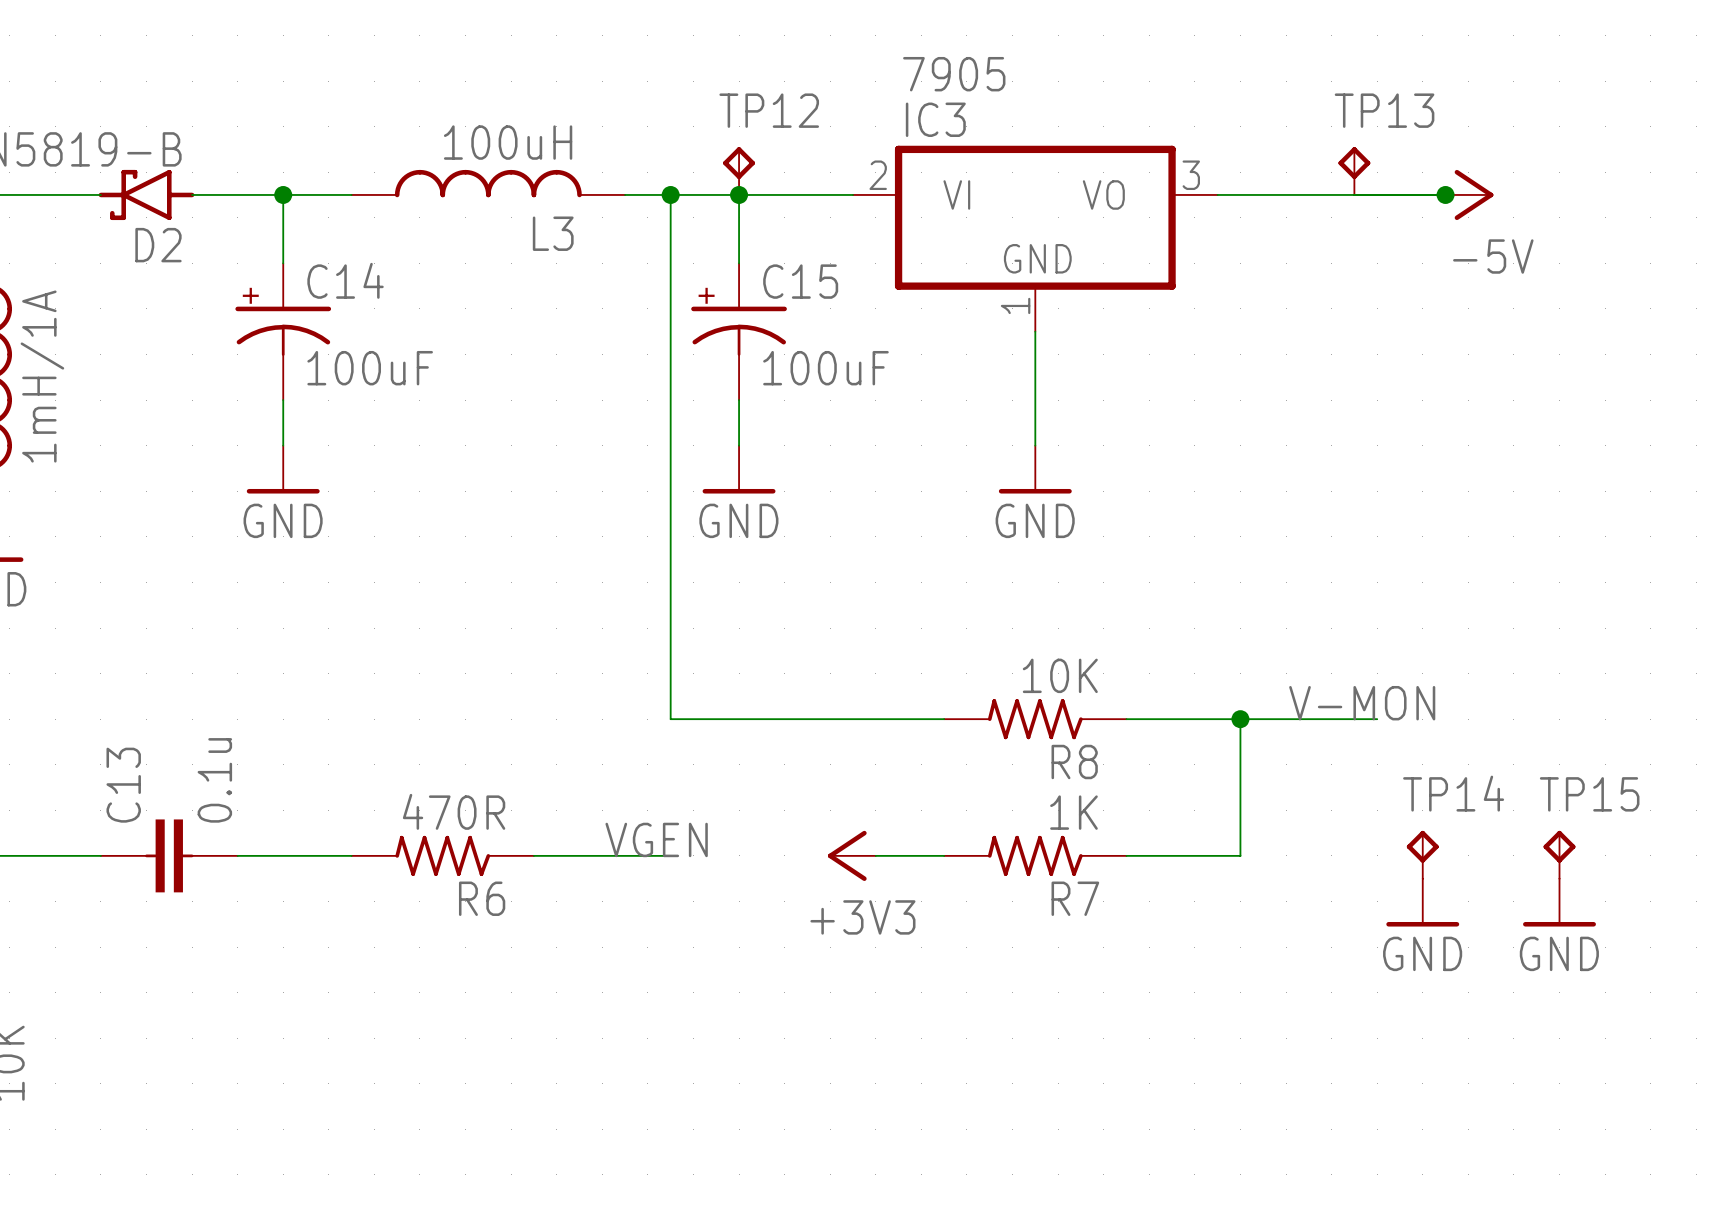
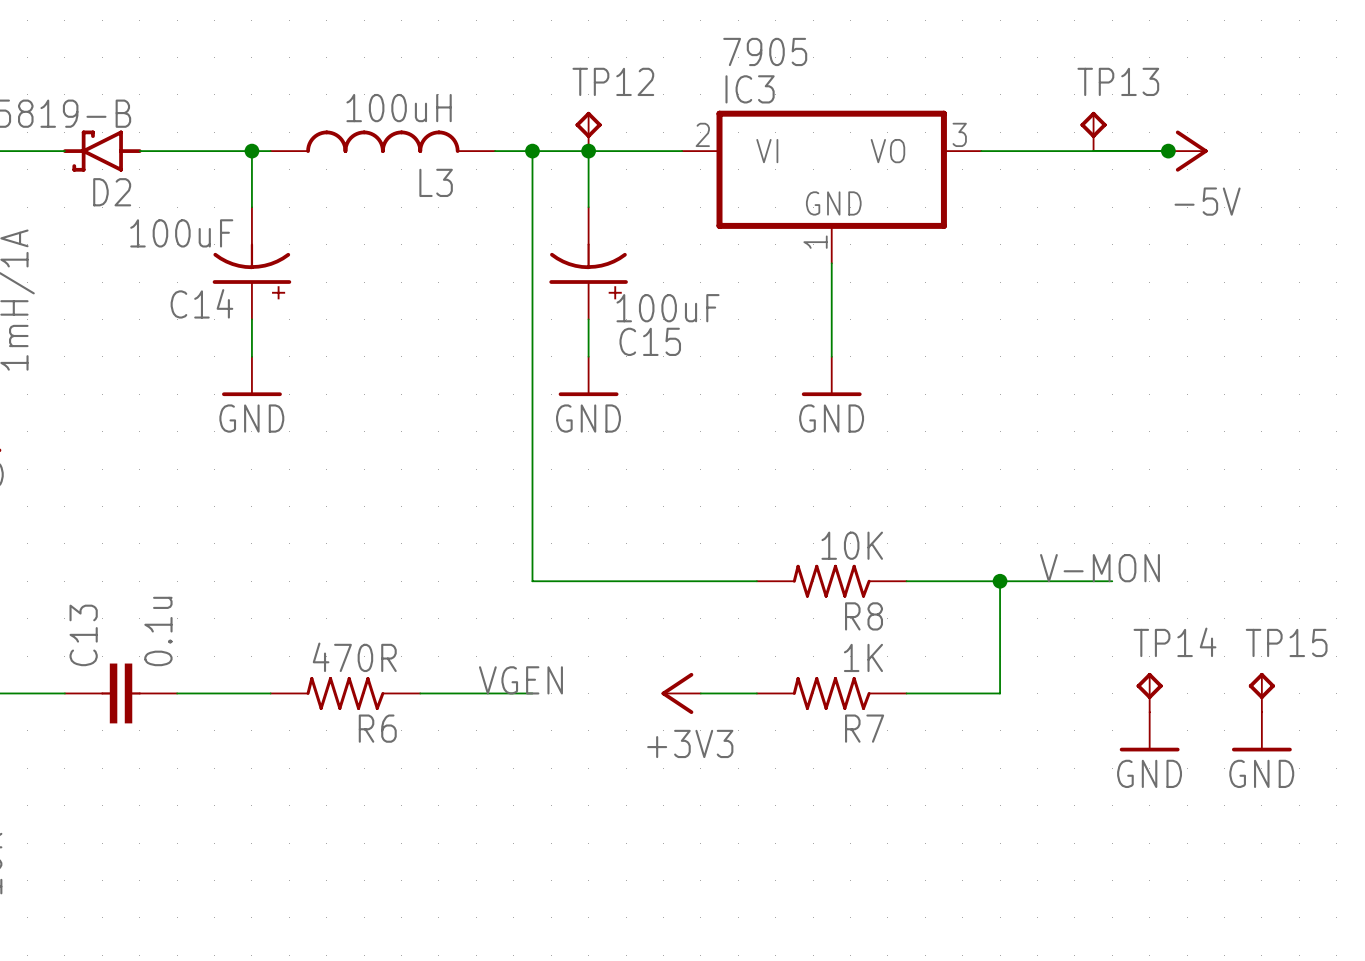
wire: (283, 194) (283, 263) -> (251, 151) (251, 207)
junction position: (283, 194) -> (251, 151)
C15 name position: C15 (800, 281) -> C15 (650, 341)
C14 rotation: 0° (283, 321) -> 180° (251, 271)
C15 rotation: 0° (739, 321) -> 180° (588, 271)
wire: (283, 400) (283, 445) -> (251, 319) (251, 356)
power symbol position: GND (283, 469) -> GND (251, 376)

